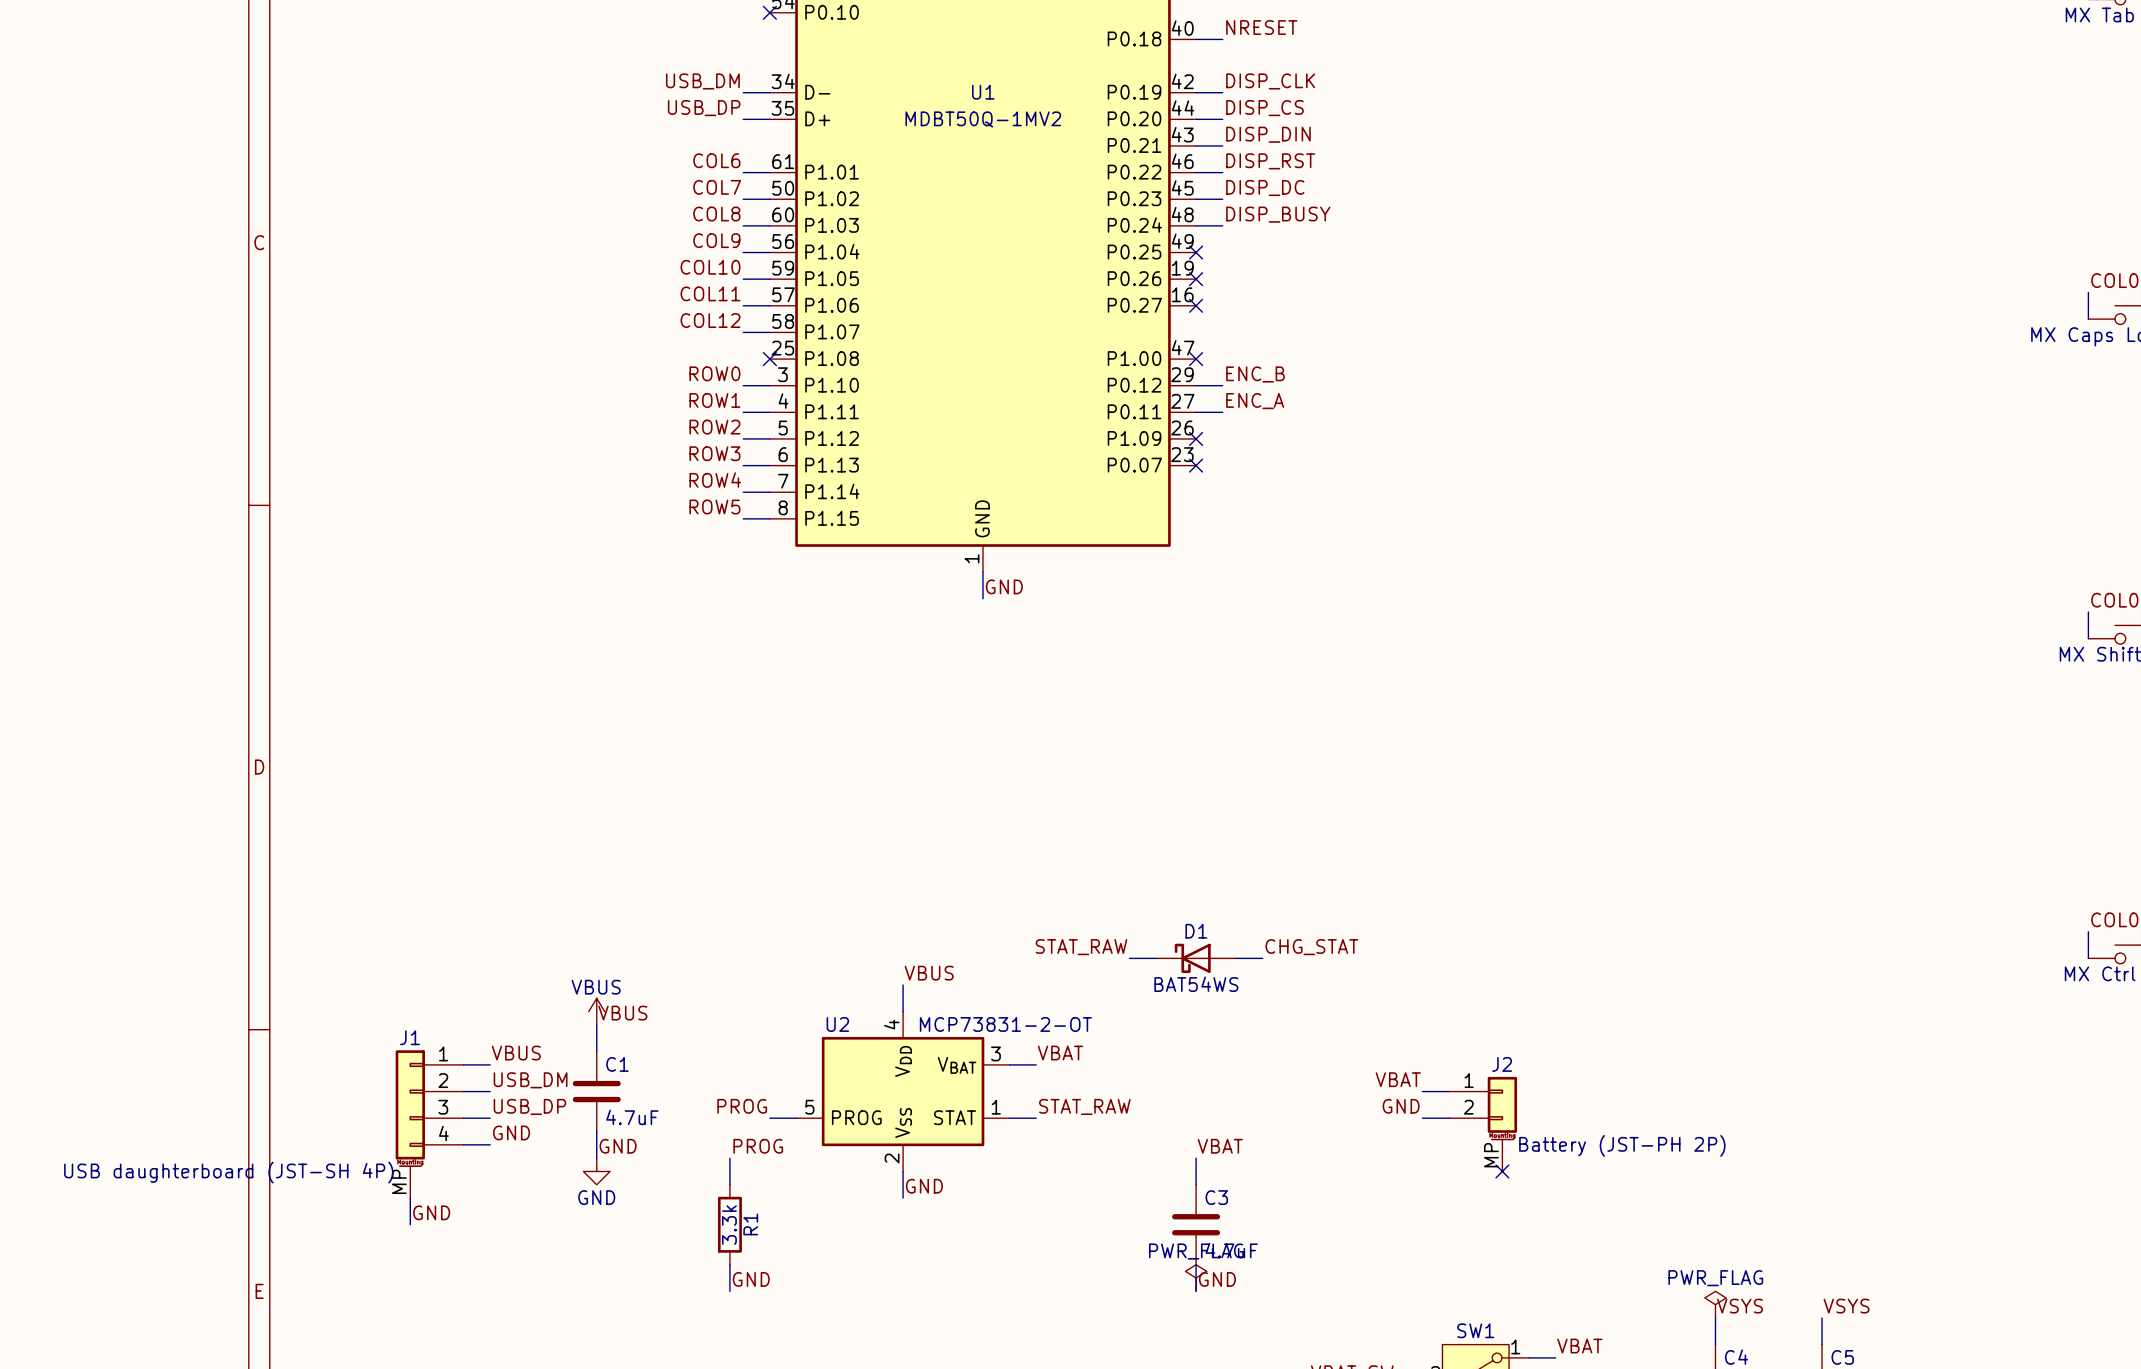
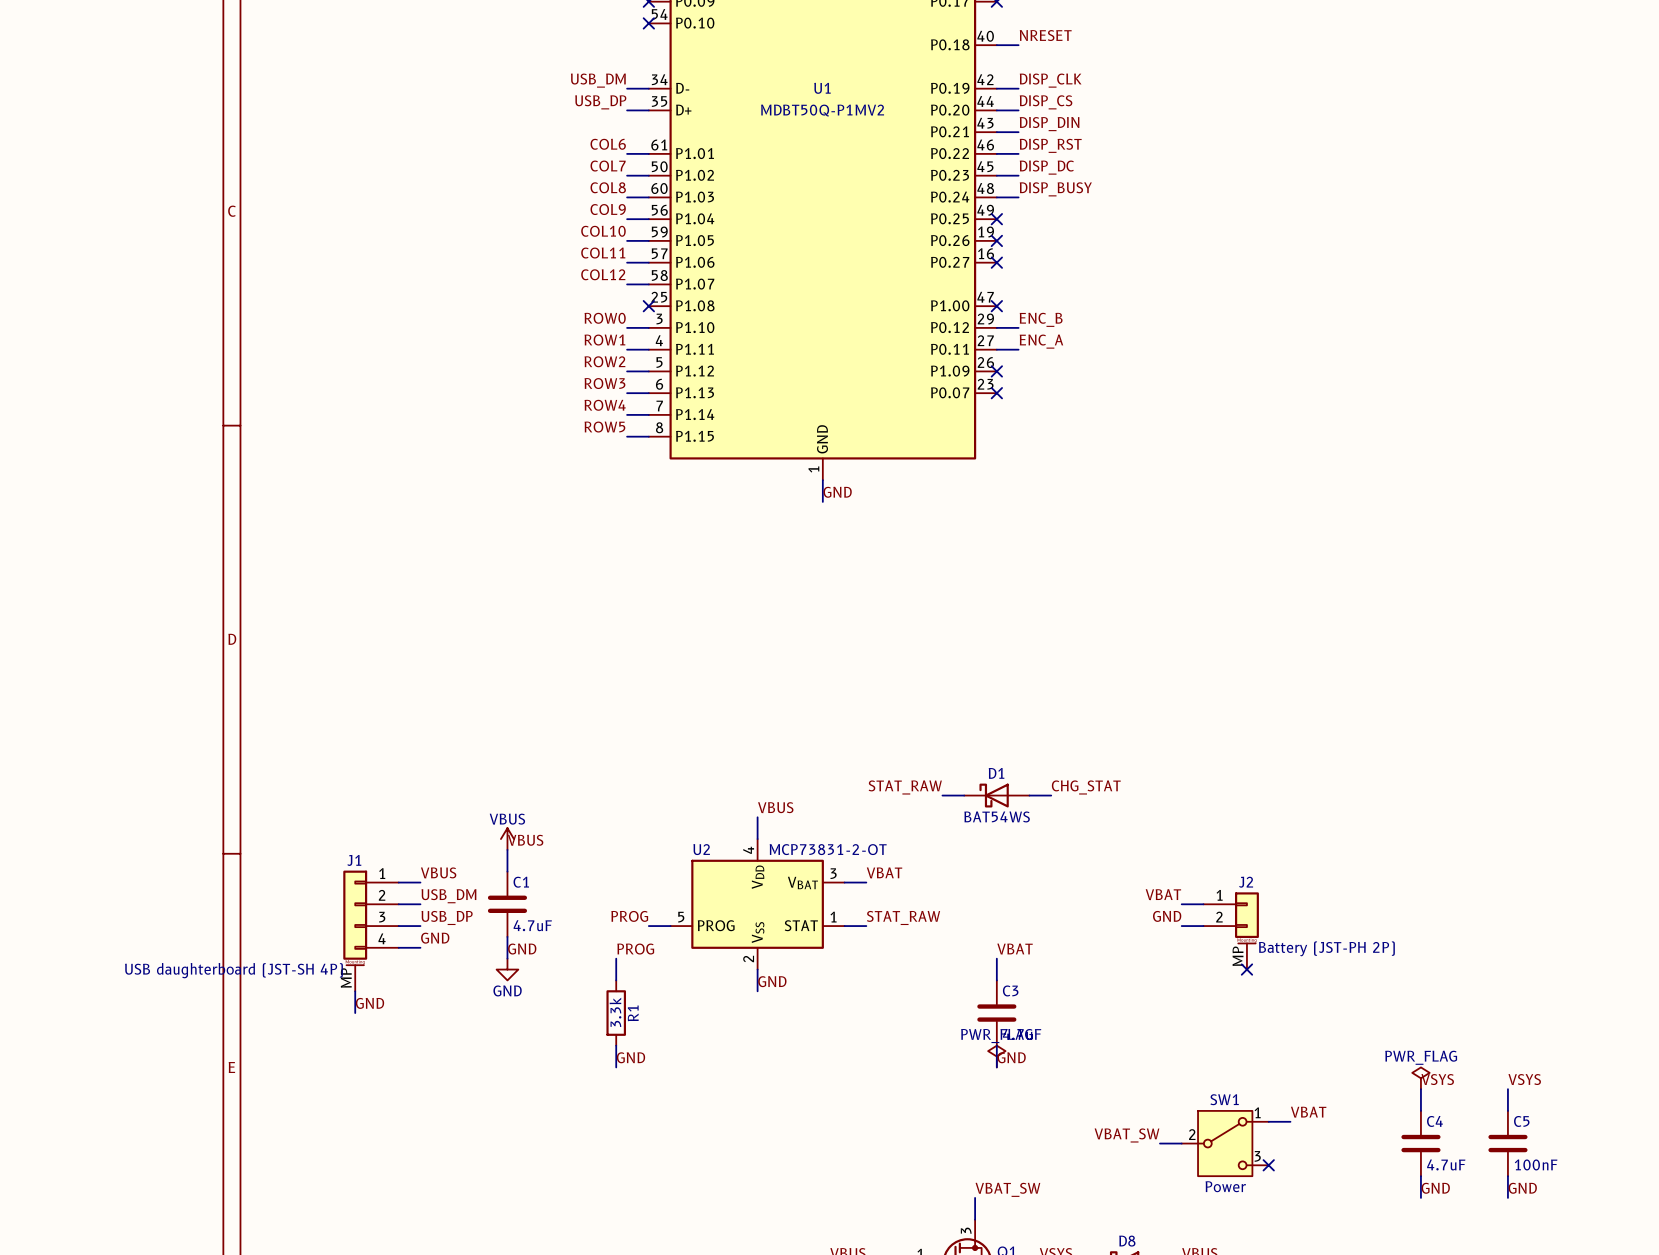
U1 value: MDBT50Q-1MV2 (983, 119) -> MDBT50Q-P1MV2 (822, 110)

